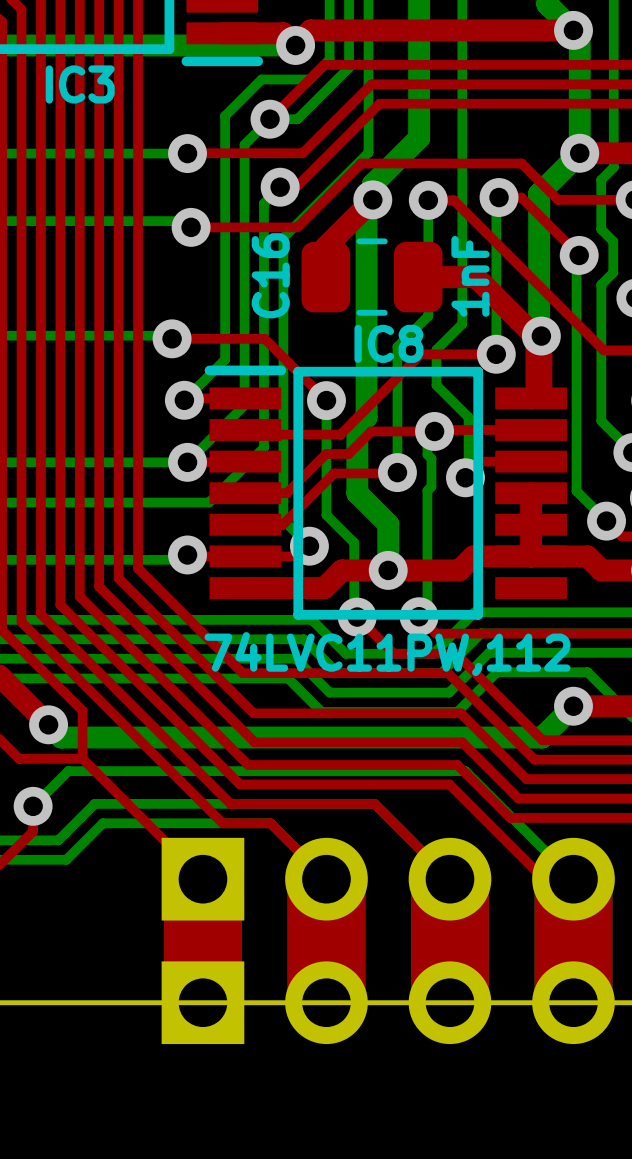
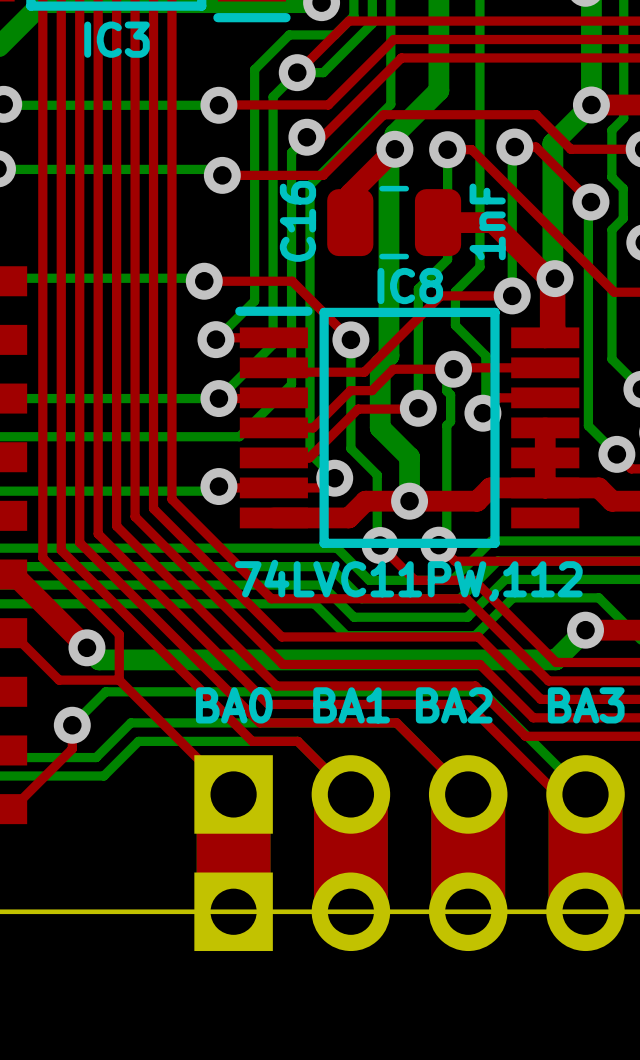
text: none -> BA0 (234, 705)
text: none -> BA1 (351, 705)
text: none -> BA2 (454, 705)
text: none -> BA3 (586, 705)

